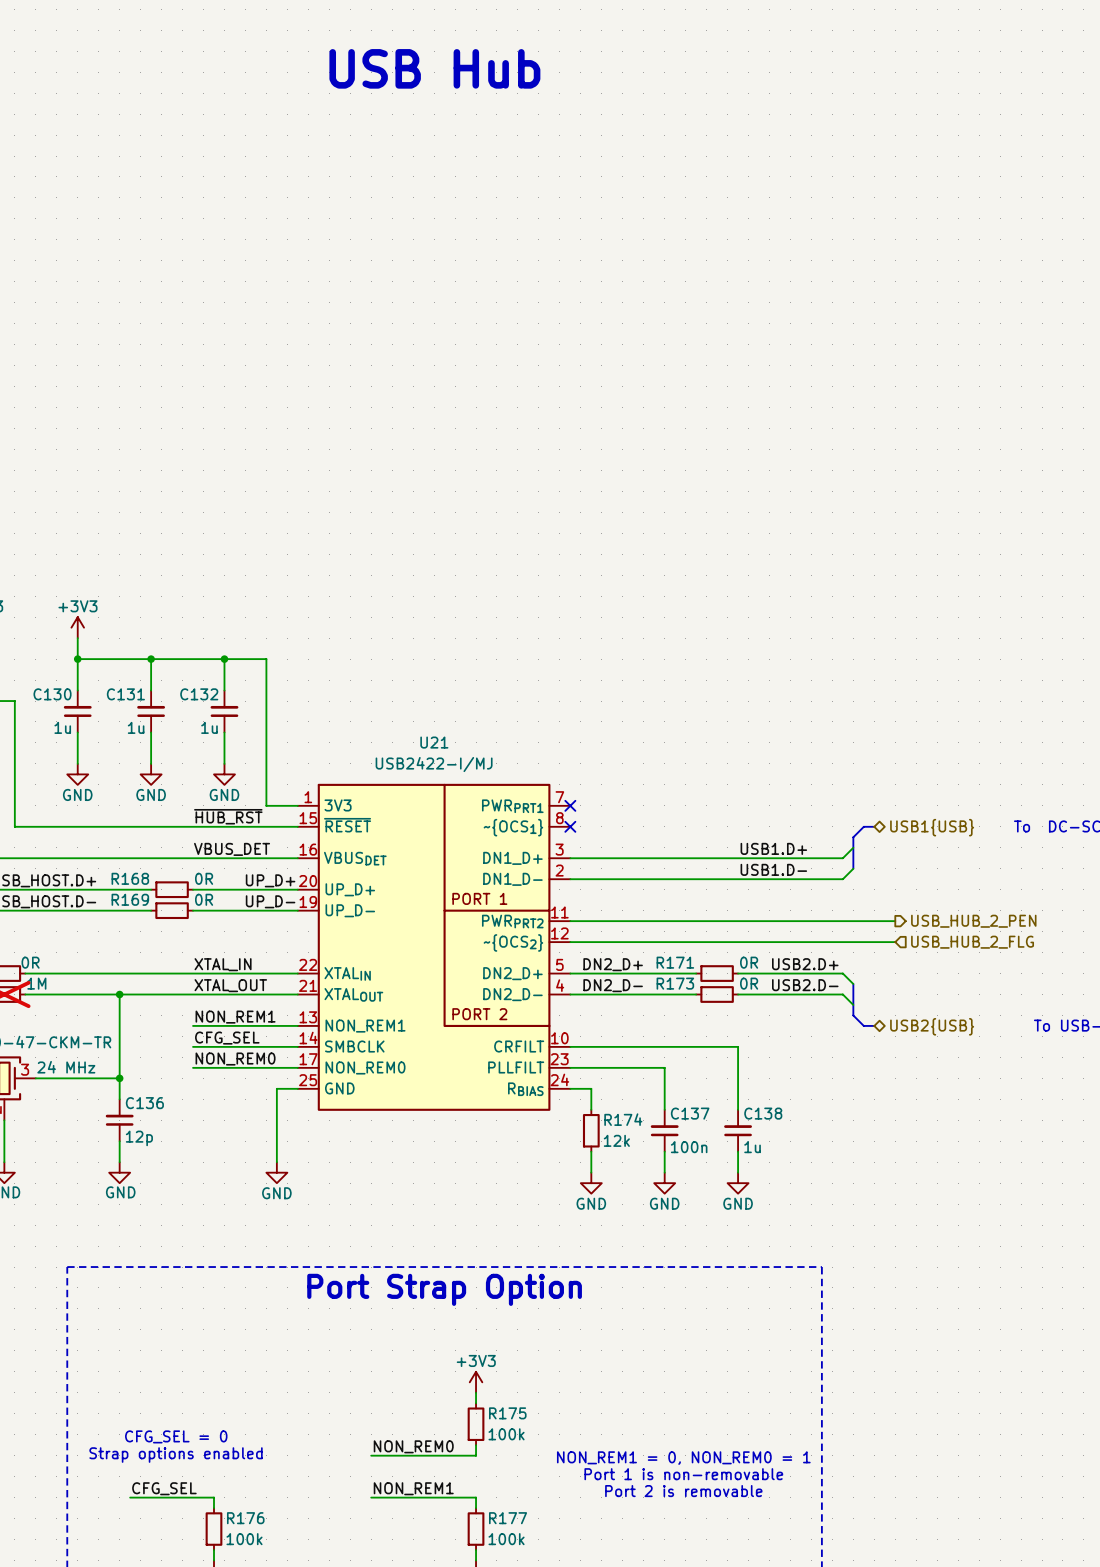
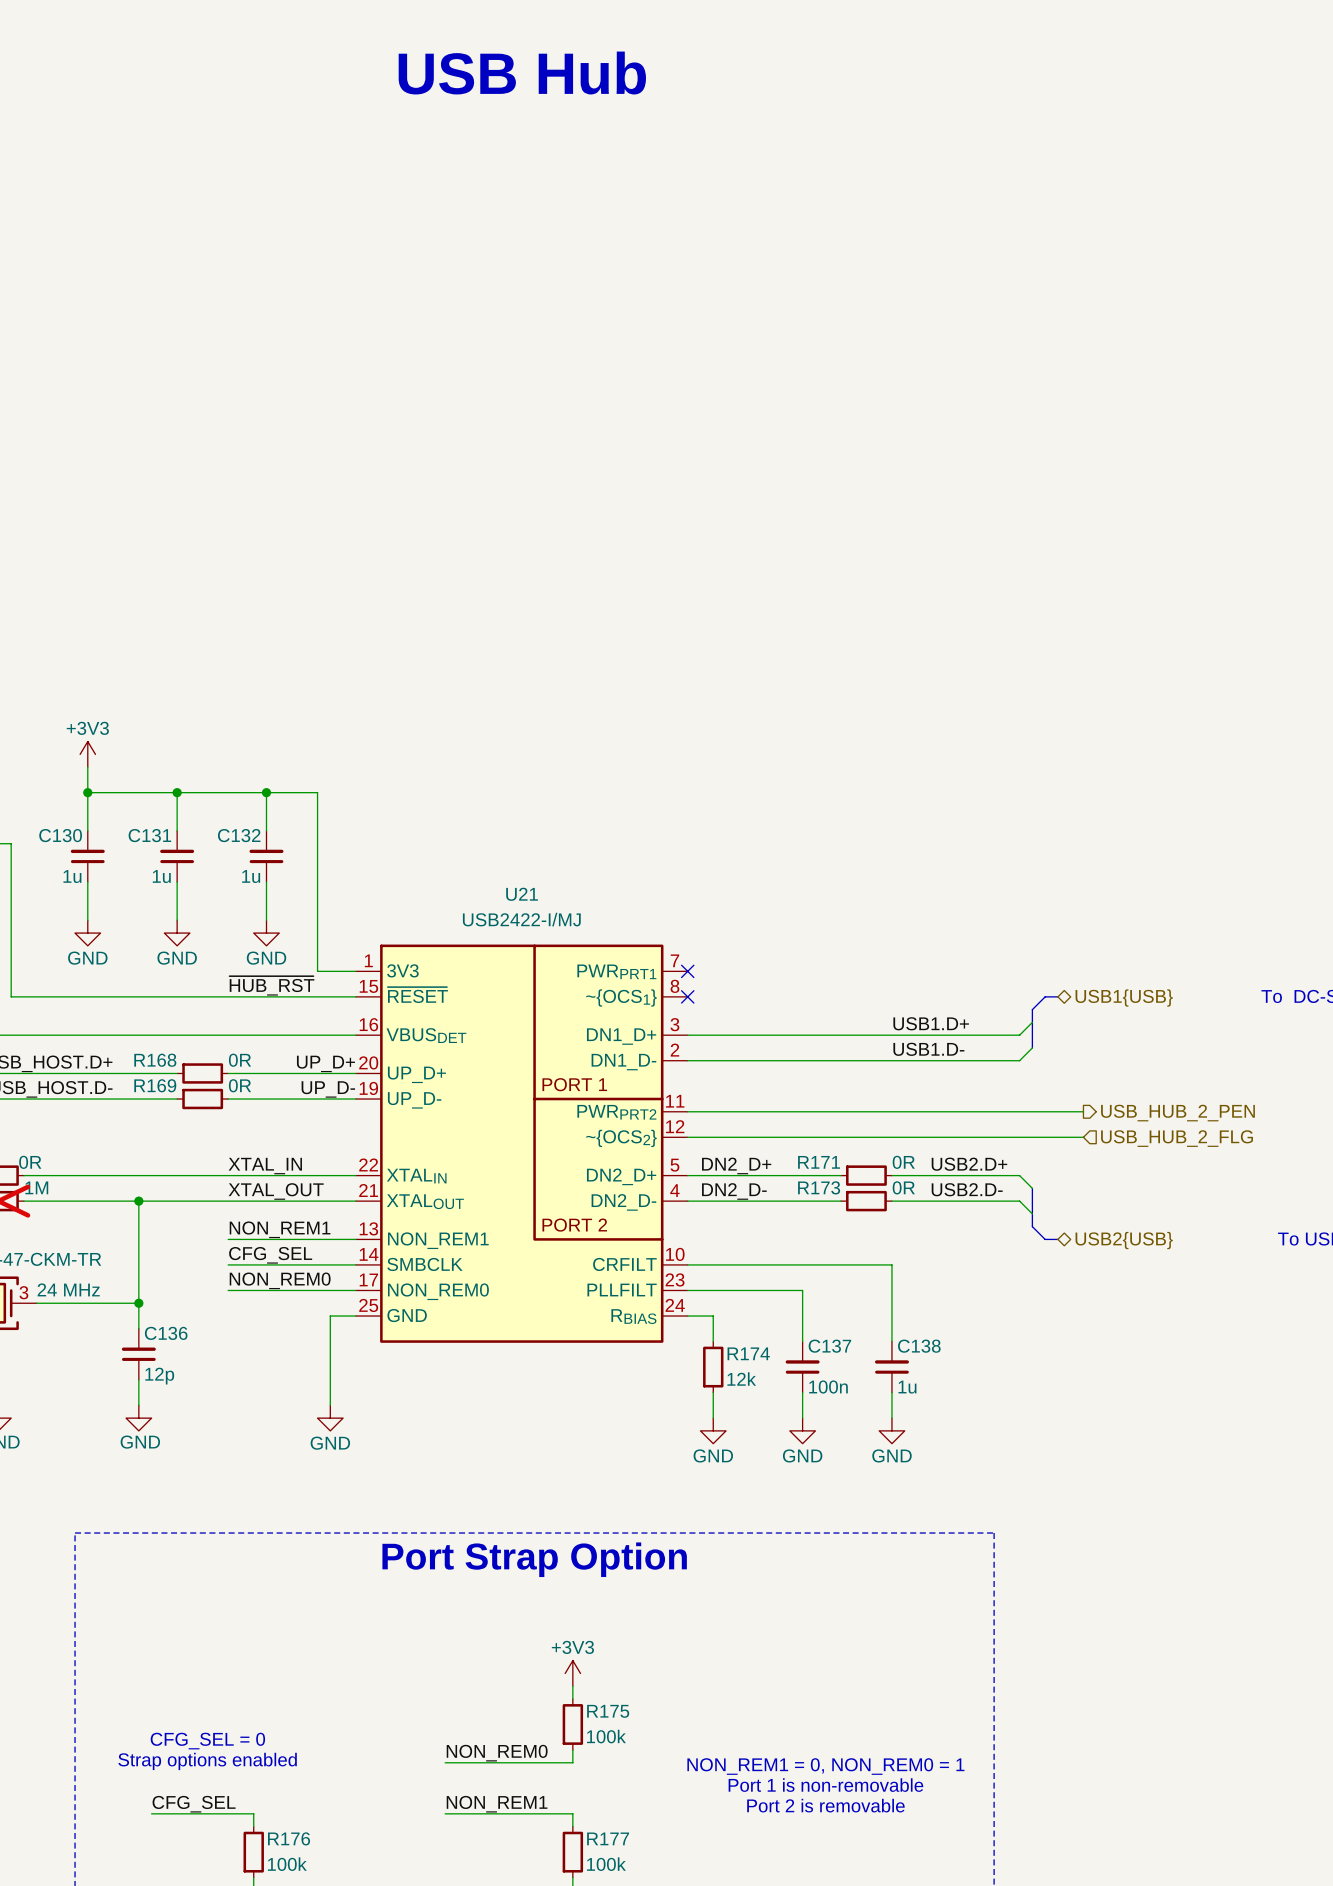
label: VBUS_DET (232, 849) -> none

